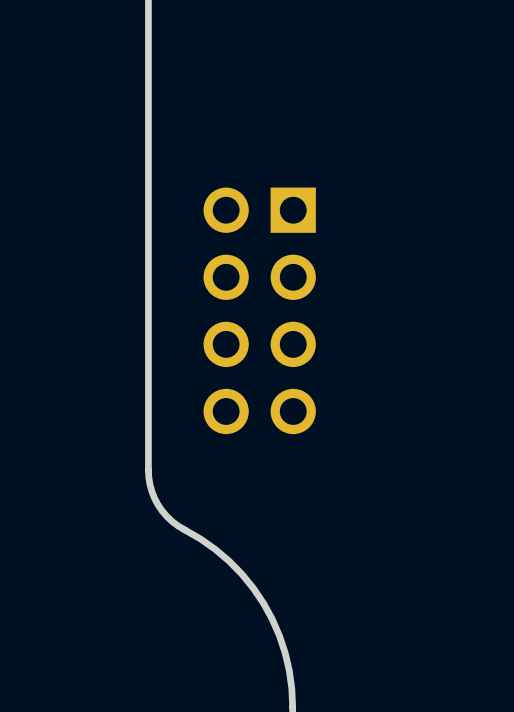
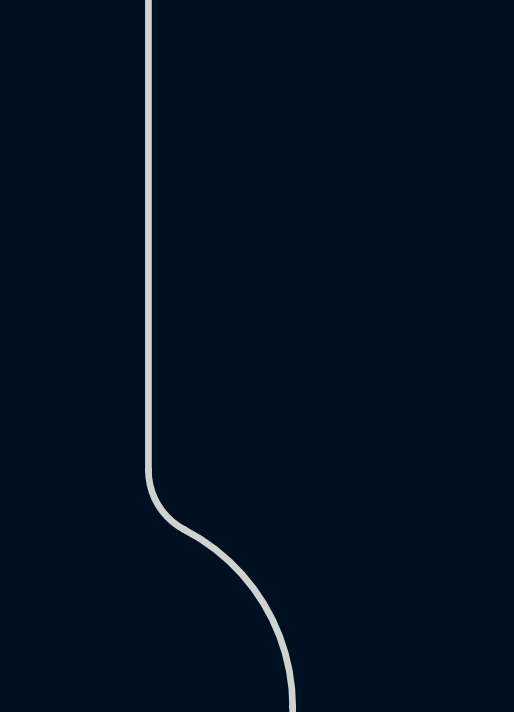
part: (259, 310) -> none

